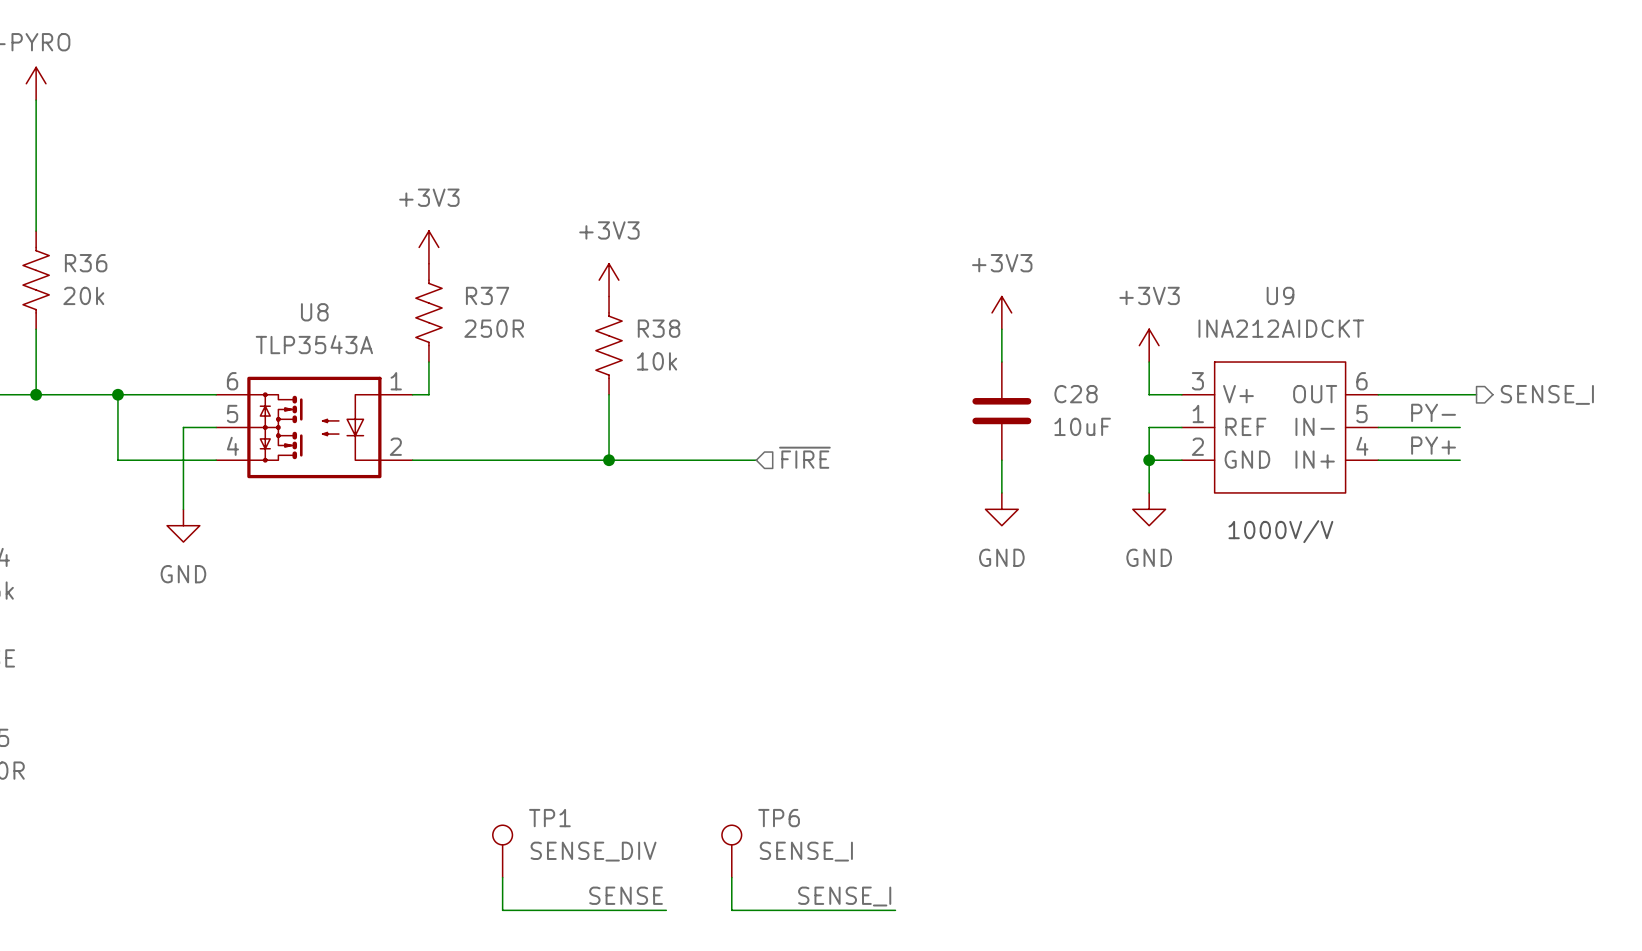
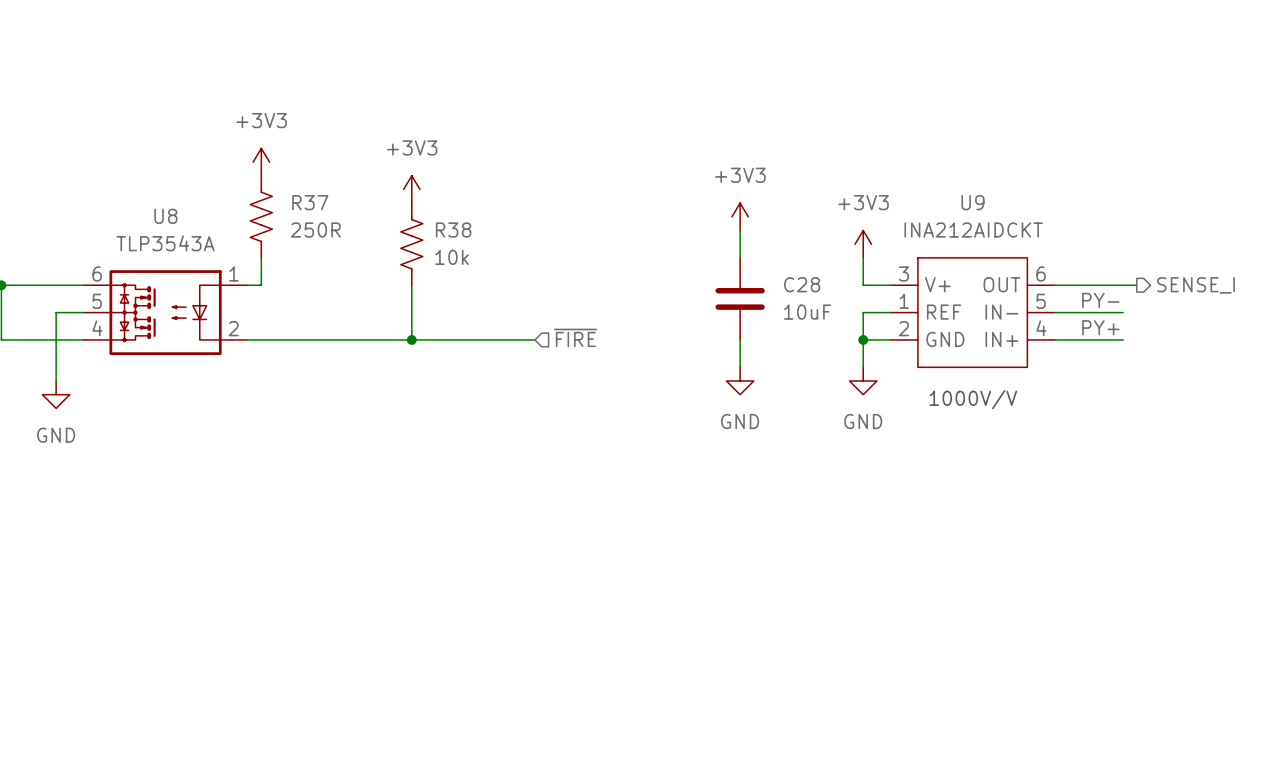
TP1: SENSE_DIV (502, 851) -> none
TP6: SENSE_I (731, 851) -> none
wire: (502, 877) (502, 910) (666, 910) -> none
wire: (731, 877) (731, 910) (895, 910) -> none
label: SENSE (626, 895) -> none
label: SENSE_I (844, 896) -> none

